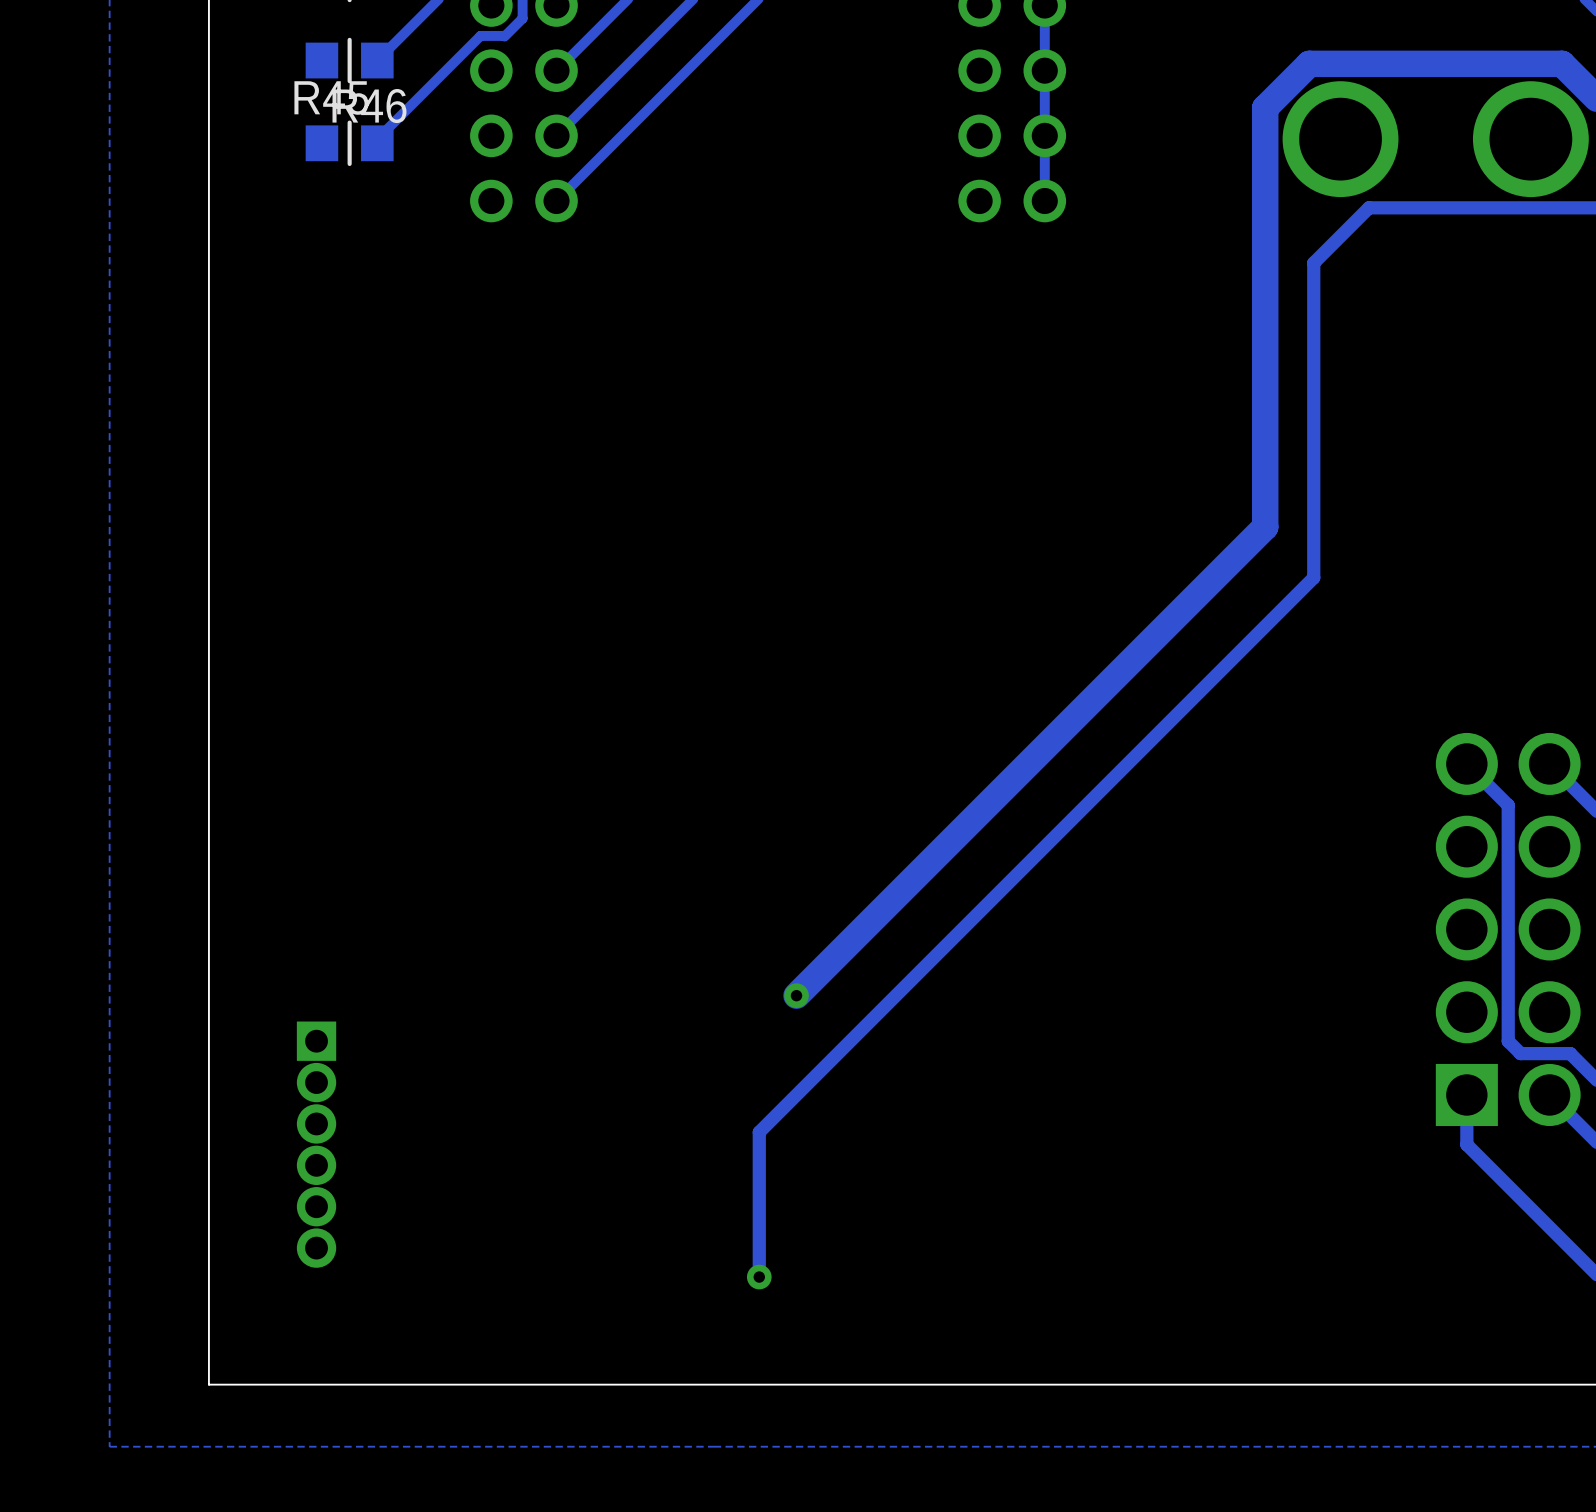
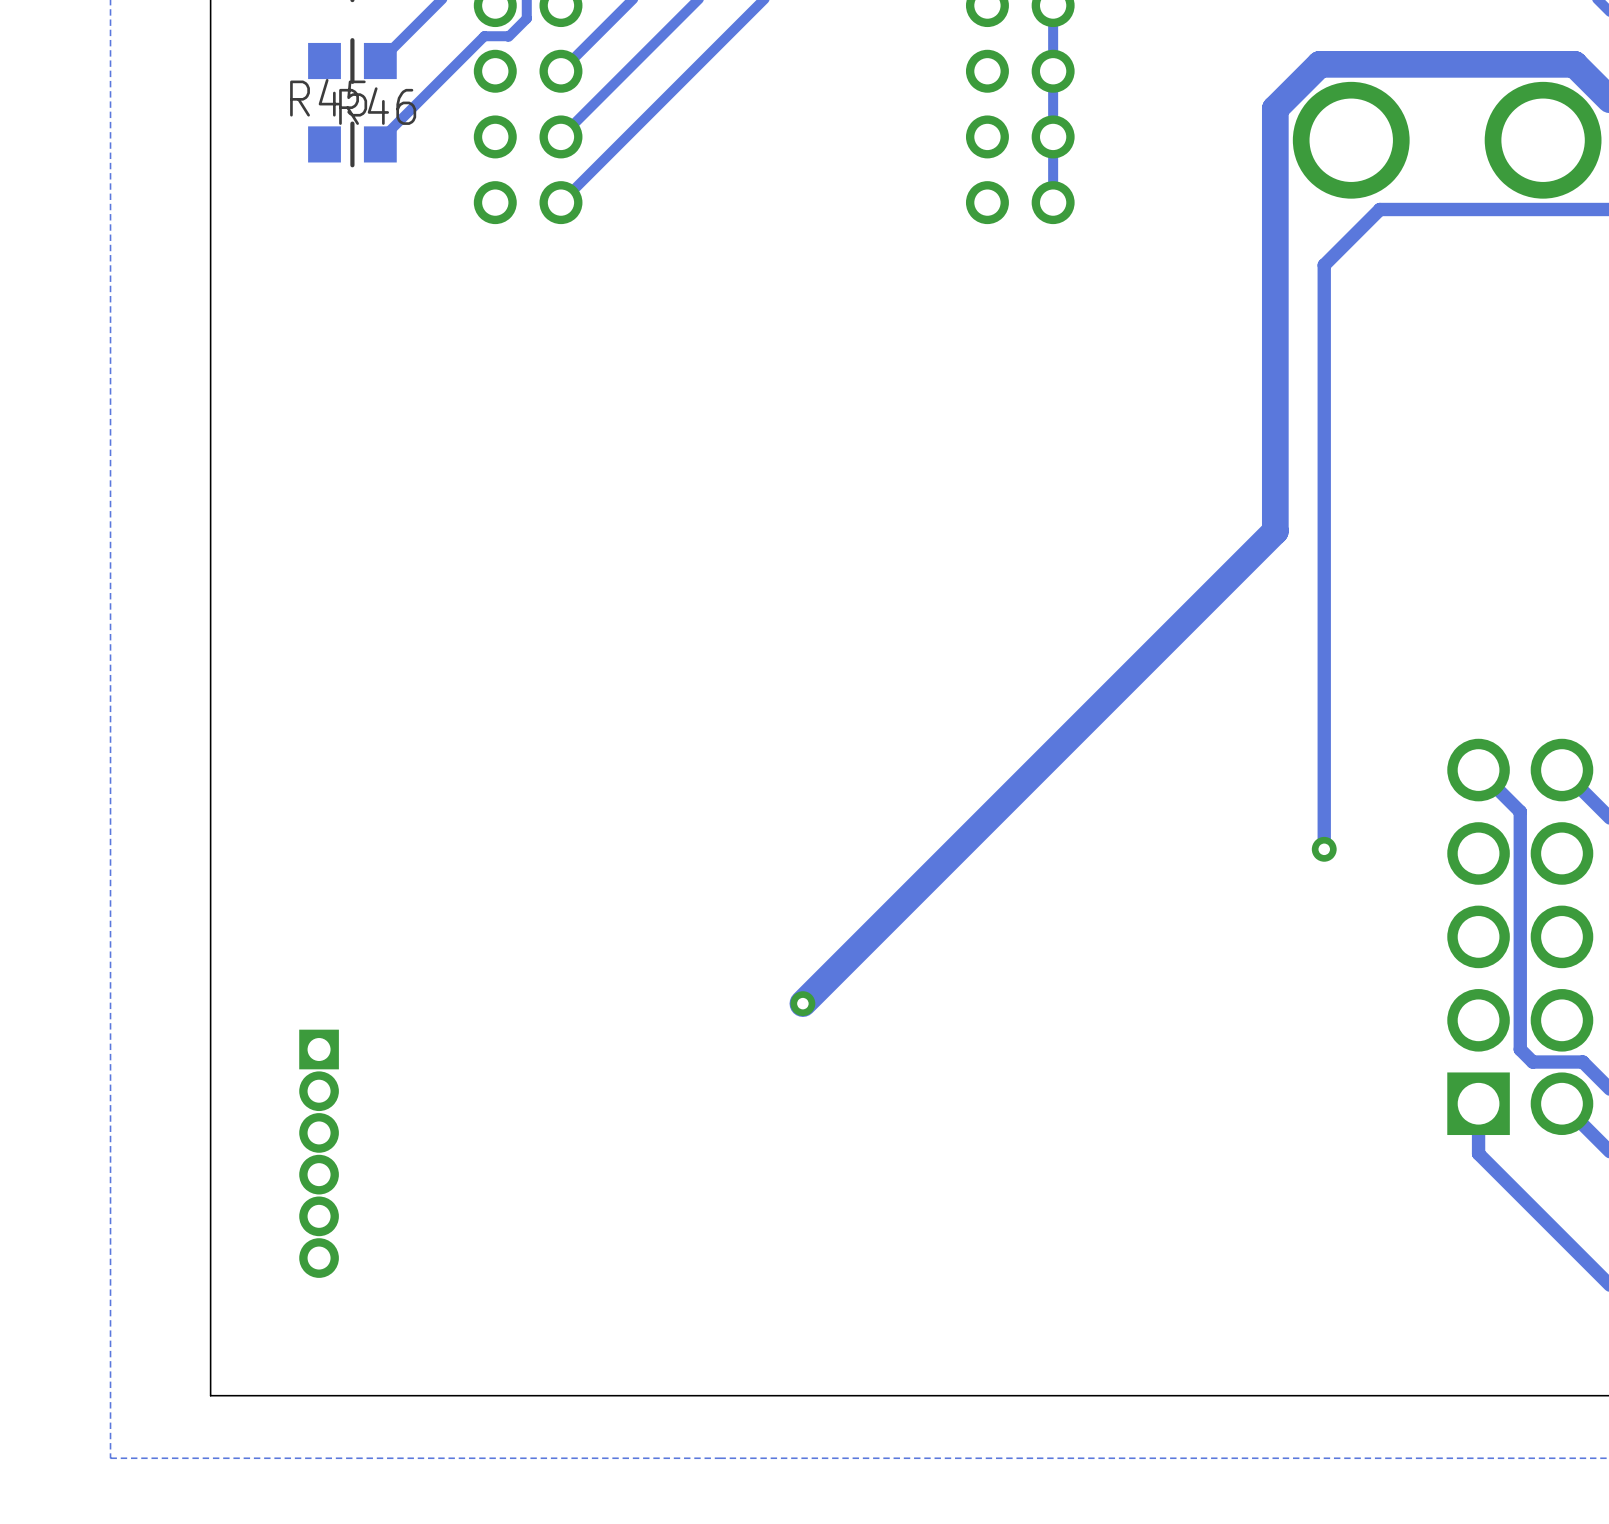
track: (1313, 577) (759, 1132) (759, 1277) -> (1324, 582) (1324, 849)
via: none -> (1324, 849)
via: (759, 1277) -> none

